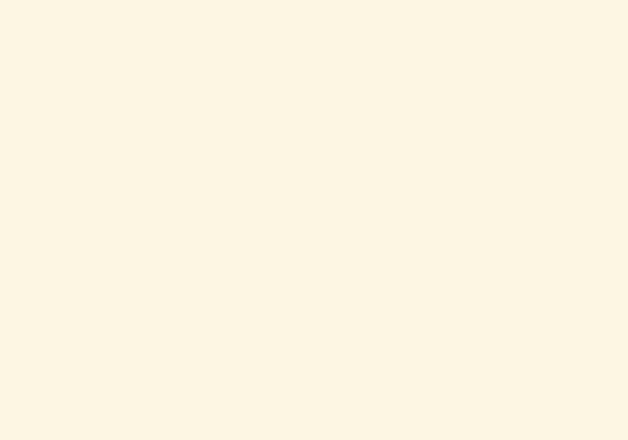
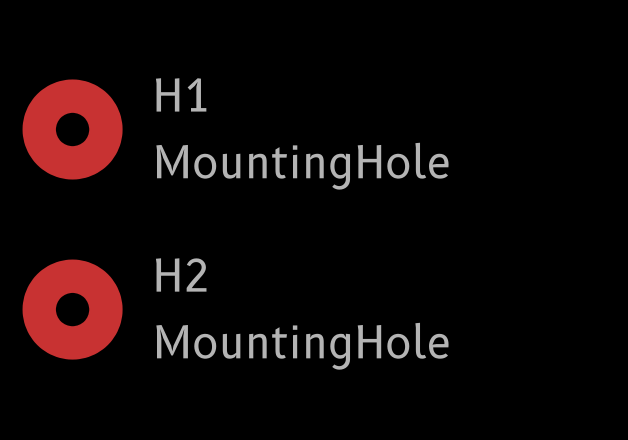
H1: none -> MountingHole (72, 129)
H2: none -> MountingHole (72, 309)

